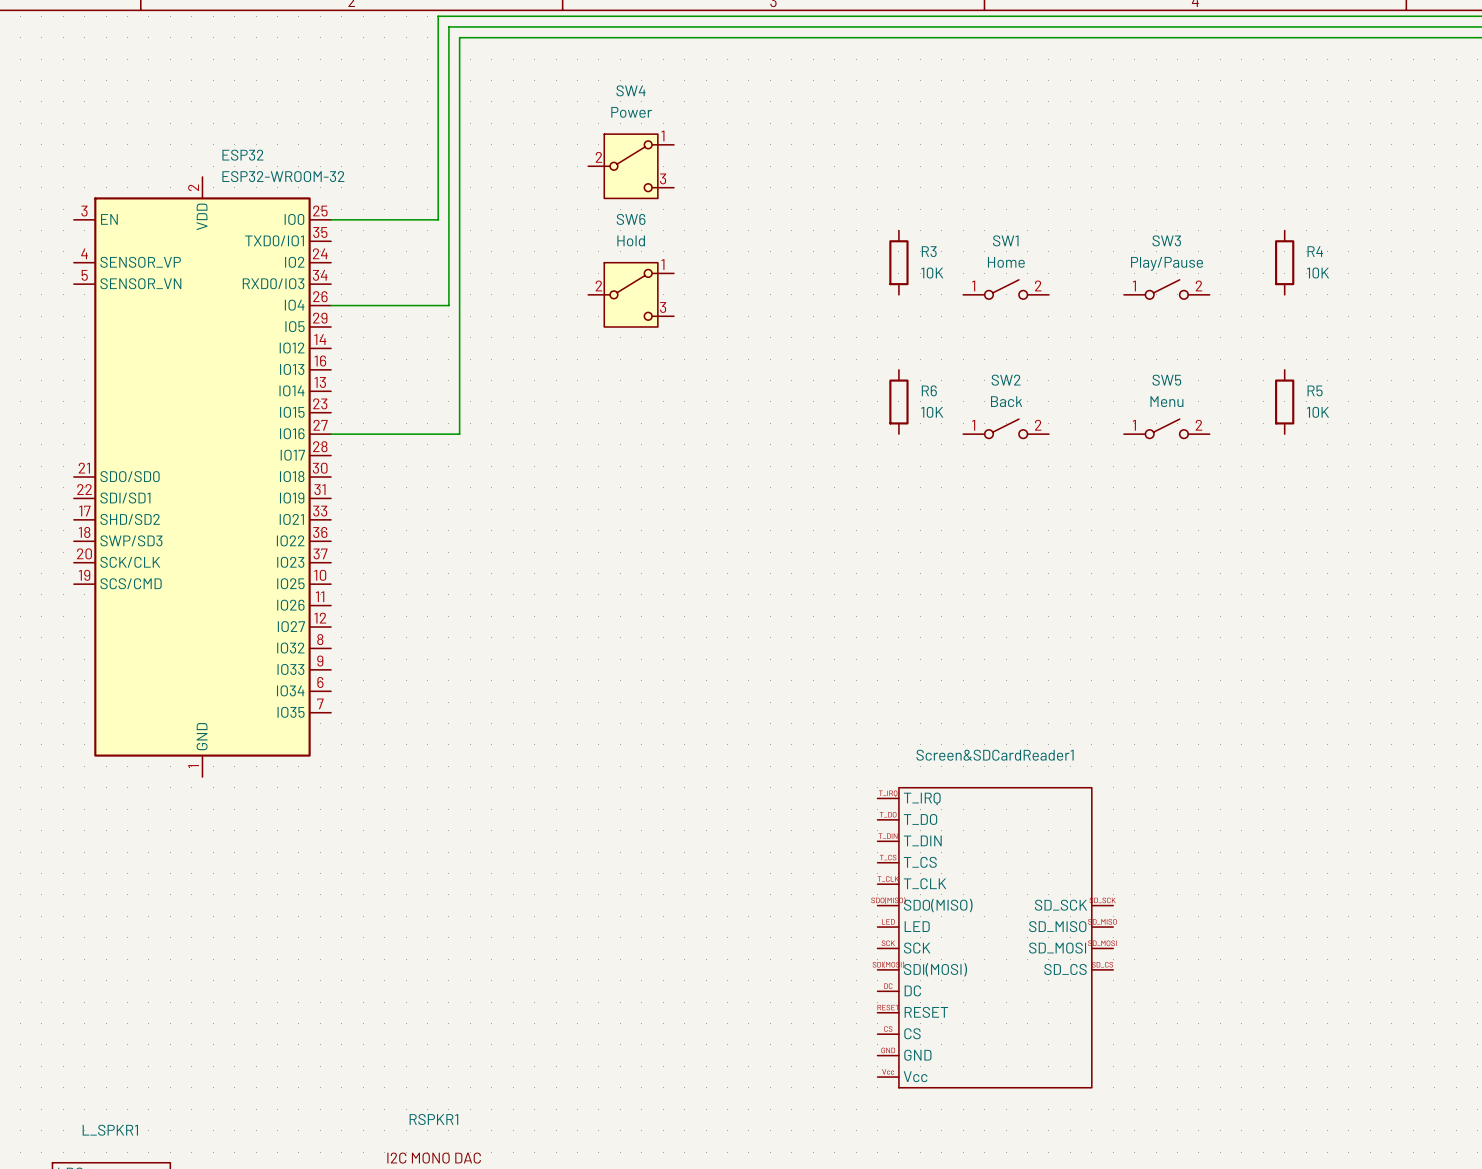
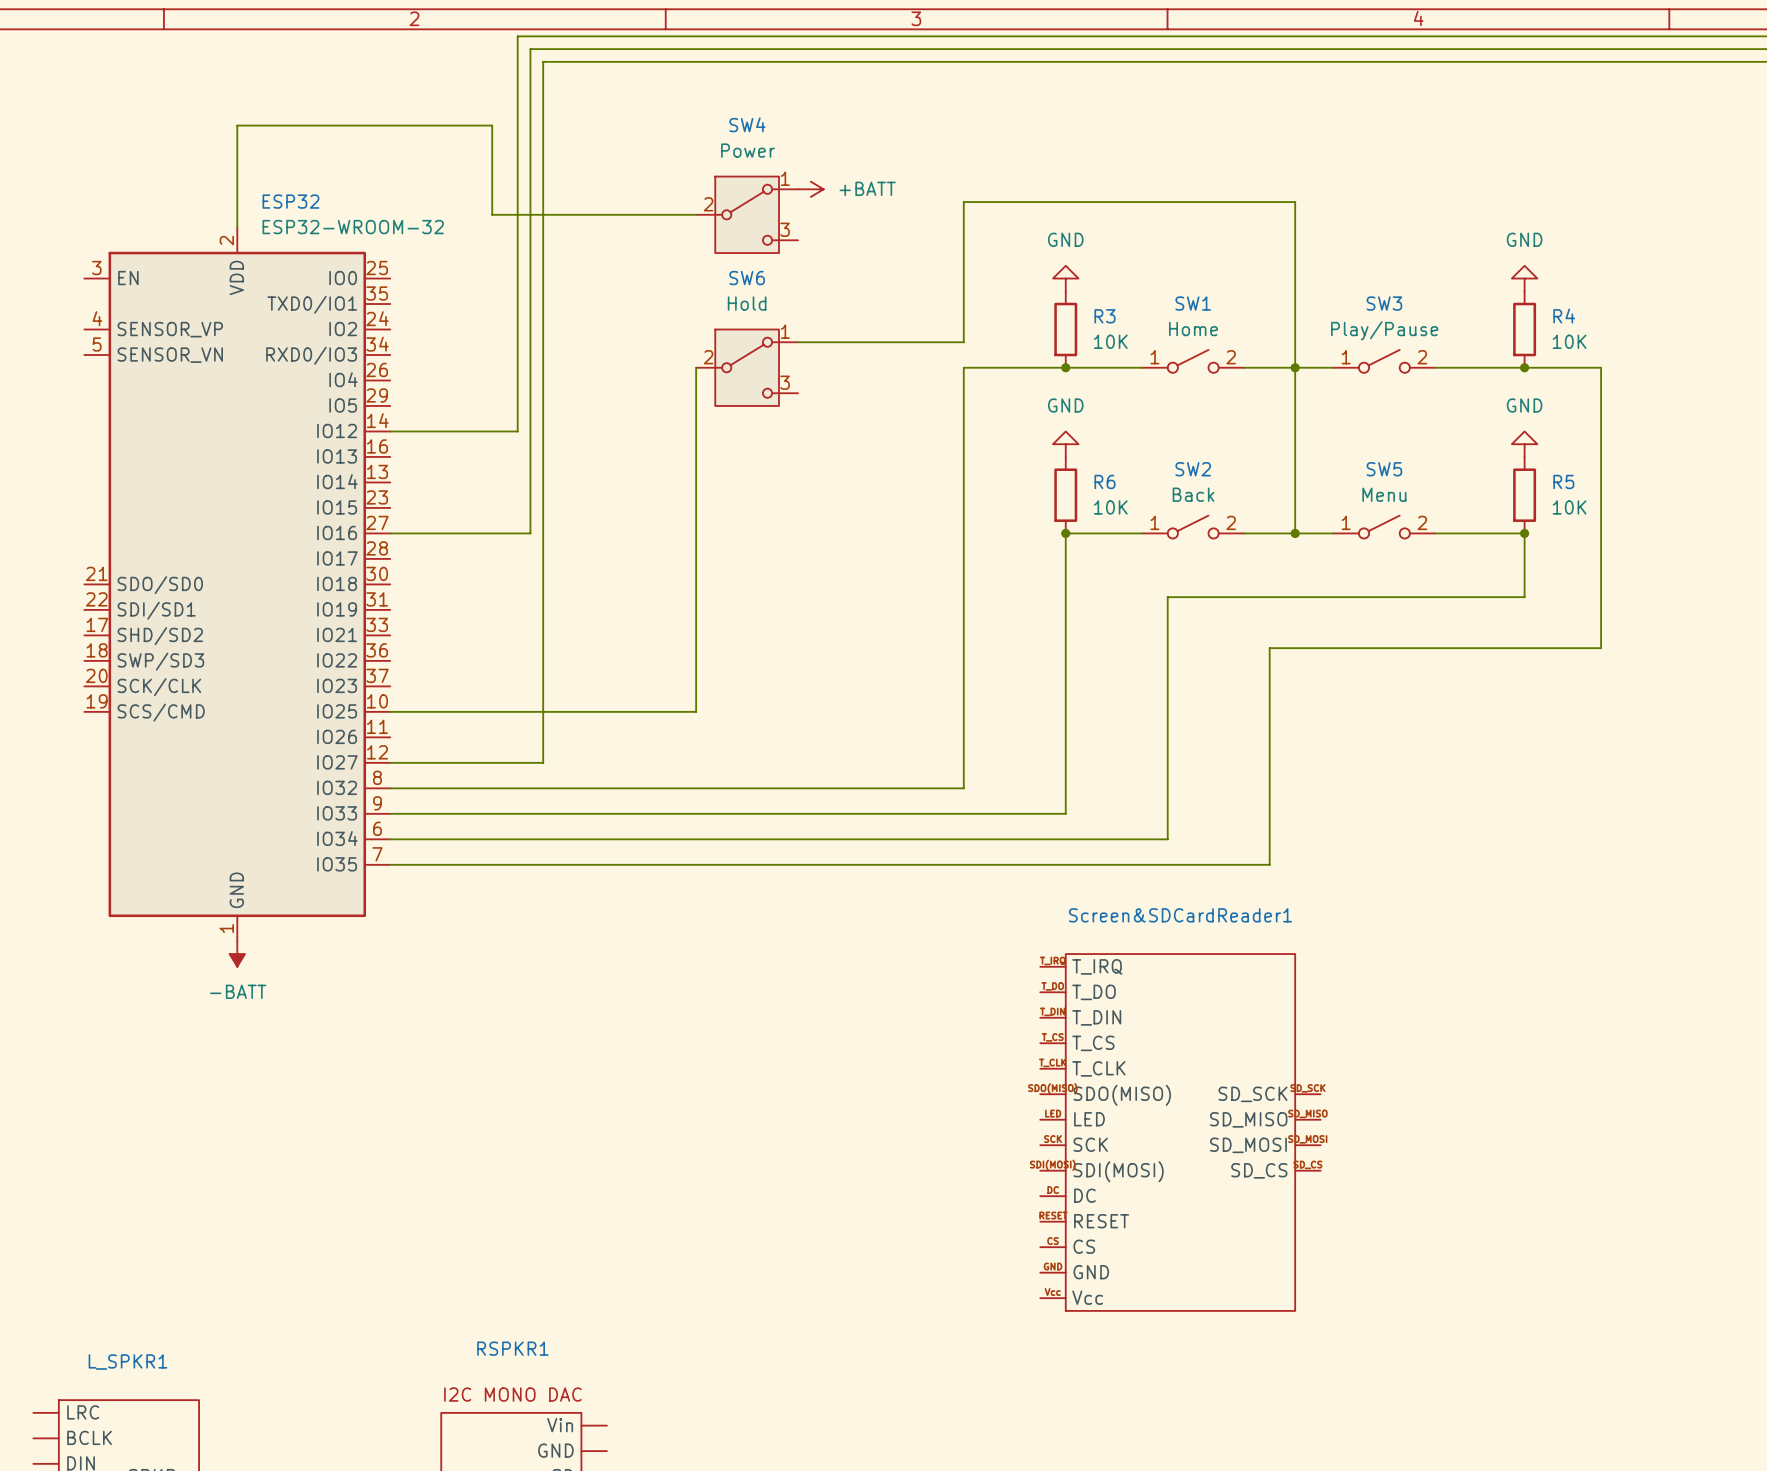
power symbol: none -> +BATT (810, 189)
wire: none -> (696, 214) (492, 214) (492, 125) (237, 125) (237, 227)
wire: (331, 219) (438, 219) -> (390, 431) (517, 431) (517, 278)
power symbol: none -> GND (1065, 278)
power symbol: none -> GND (1524, 278)
wire: none -> (798, 342) (963, 342) (963, 202) (1295, 202) (1295, 533)
wire: none -> (696, 367) (696, 711) (390, 711)
junction: none -> (1065, 367)
wire: none -> (1142, 367) (963, 367) (963, 788) (390, 788)
wire: none -> (1244, 367) (1333, 367)
junction: none -> (1295, 367)
wire: none -> (1435, 367) (1601, 367) (1601, 648) (1269, 648) (1269, 864) (390, 864)
junction: none -> (1524, 367)
wire: (331, 305) (448, 305) -> none
power symbol: none -> GND (1065, 444)
power symbol: none -> GND (1524, 444)
wire: (448, 434) (459, 434) -> (530, 533) (530, 380)
wire: none -> (543, 533) (543, 762) (390, 762)
junction: none -> (1065, 533)
wire: none -> (1142, 533) (1065, 533) (1065, 813) (390, 813)
wire: none -> (1244, 533) (1333, 533)
junction: none -> (1295, 533)
wire: none -> (1435, 533) (1524, 533) (1524, 597) (1167, 597) (1167, 839) (390, 839)
junction: none -> (1524, 533)
power symbol: none -> -BATT (237, 954)

